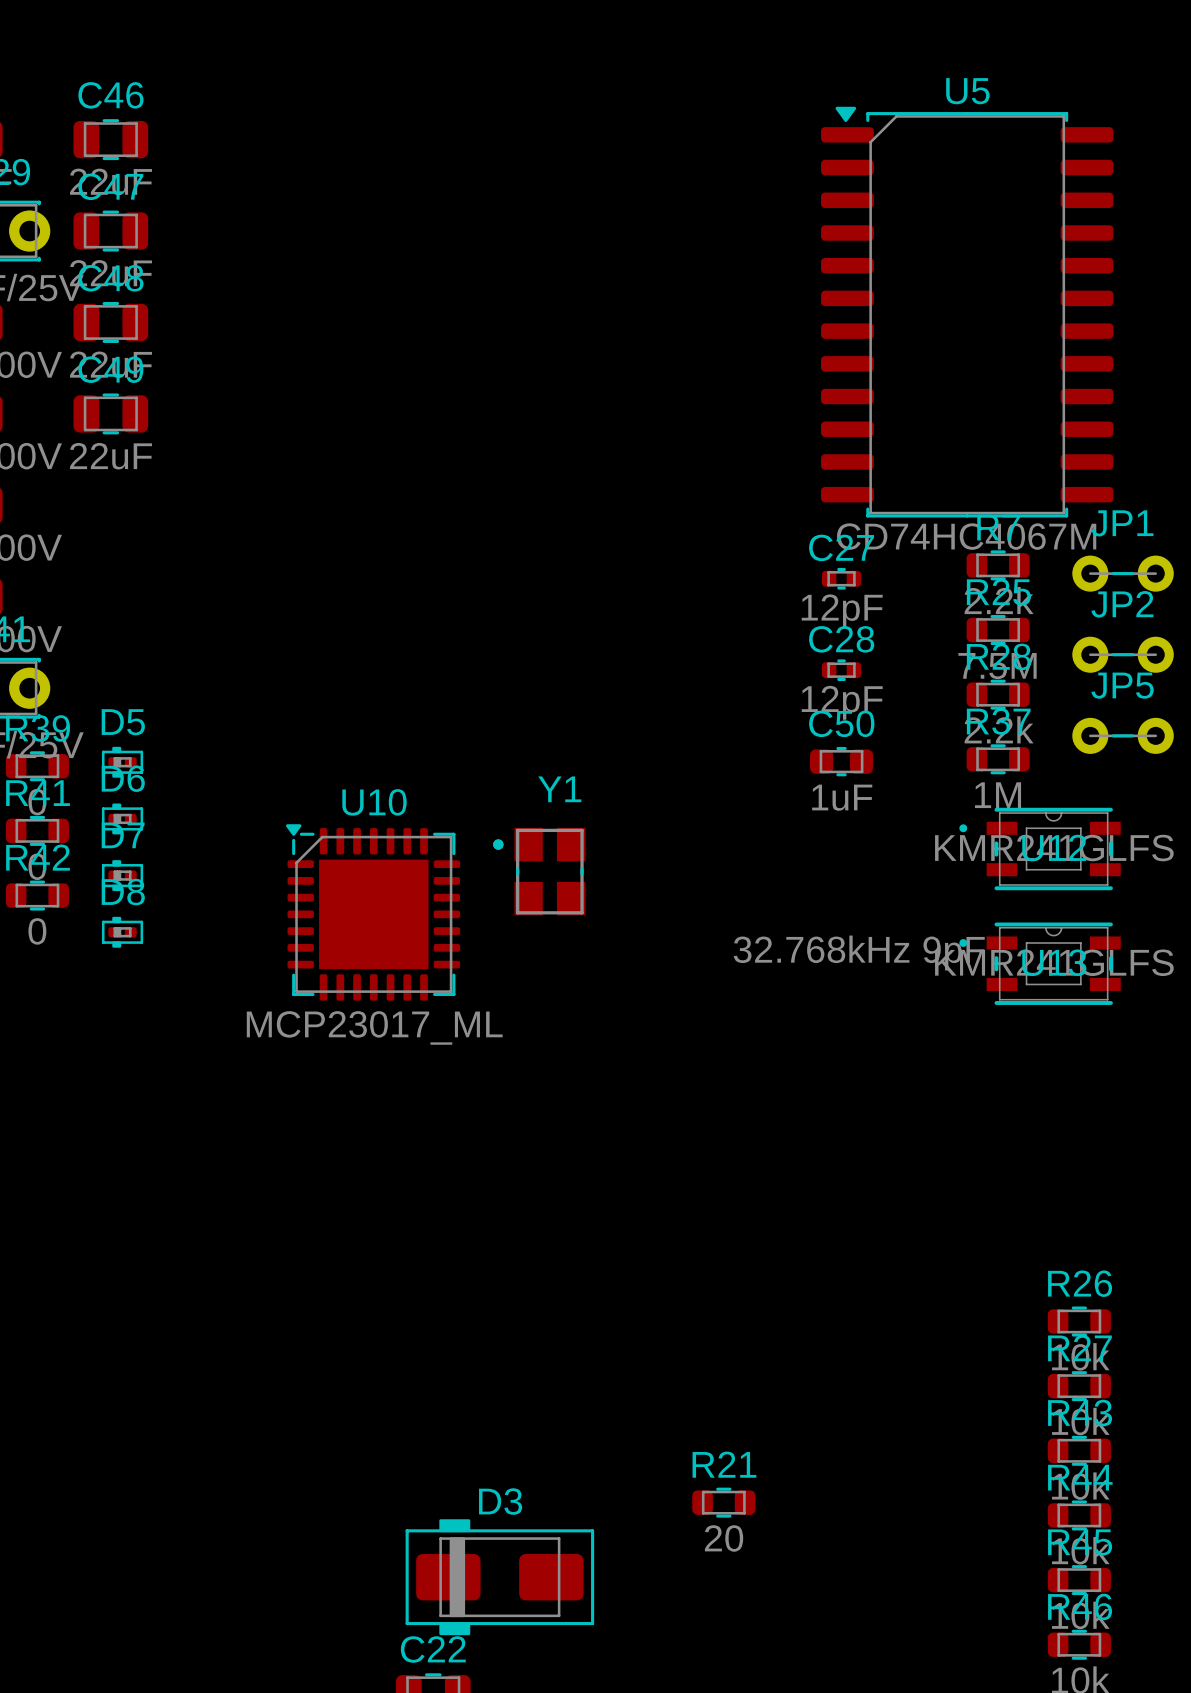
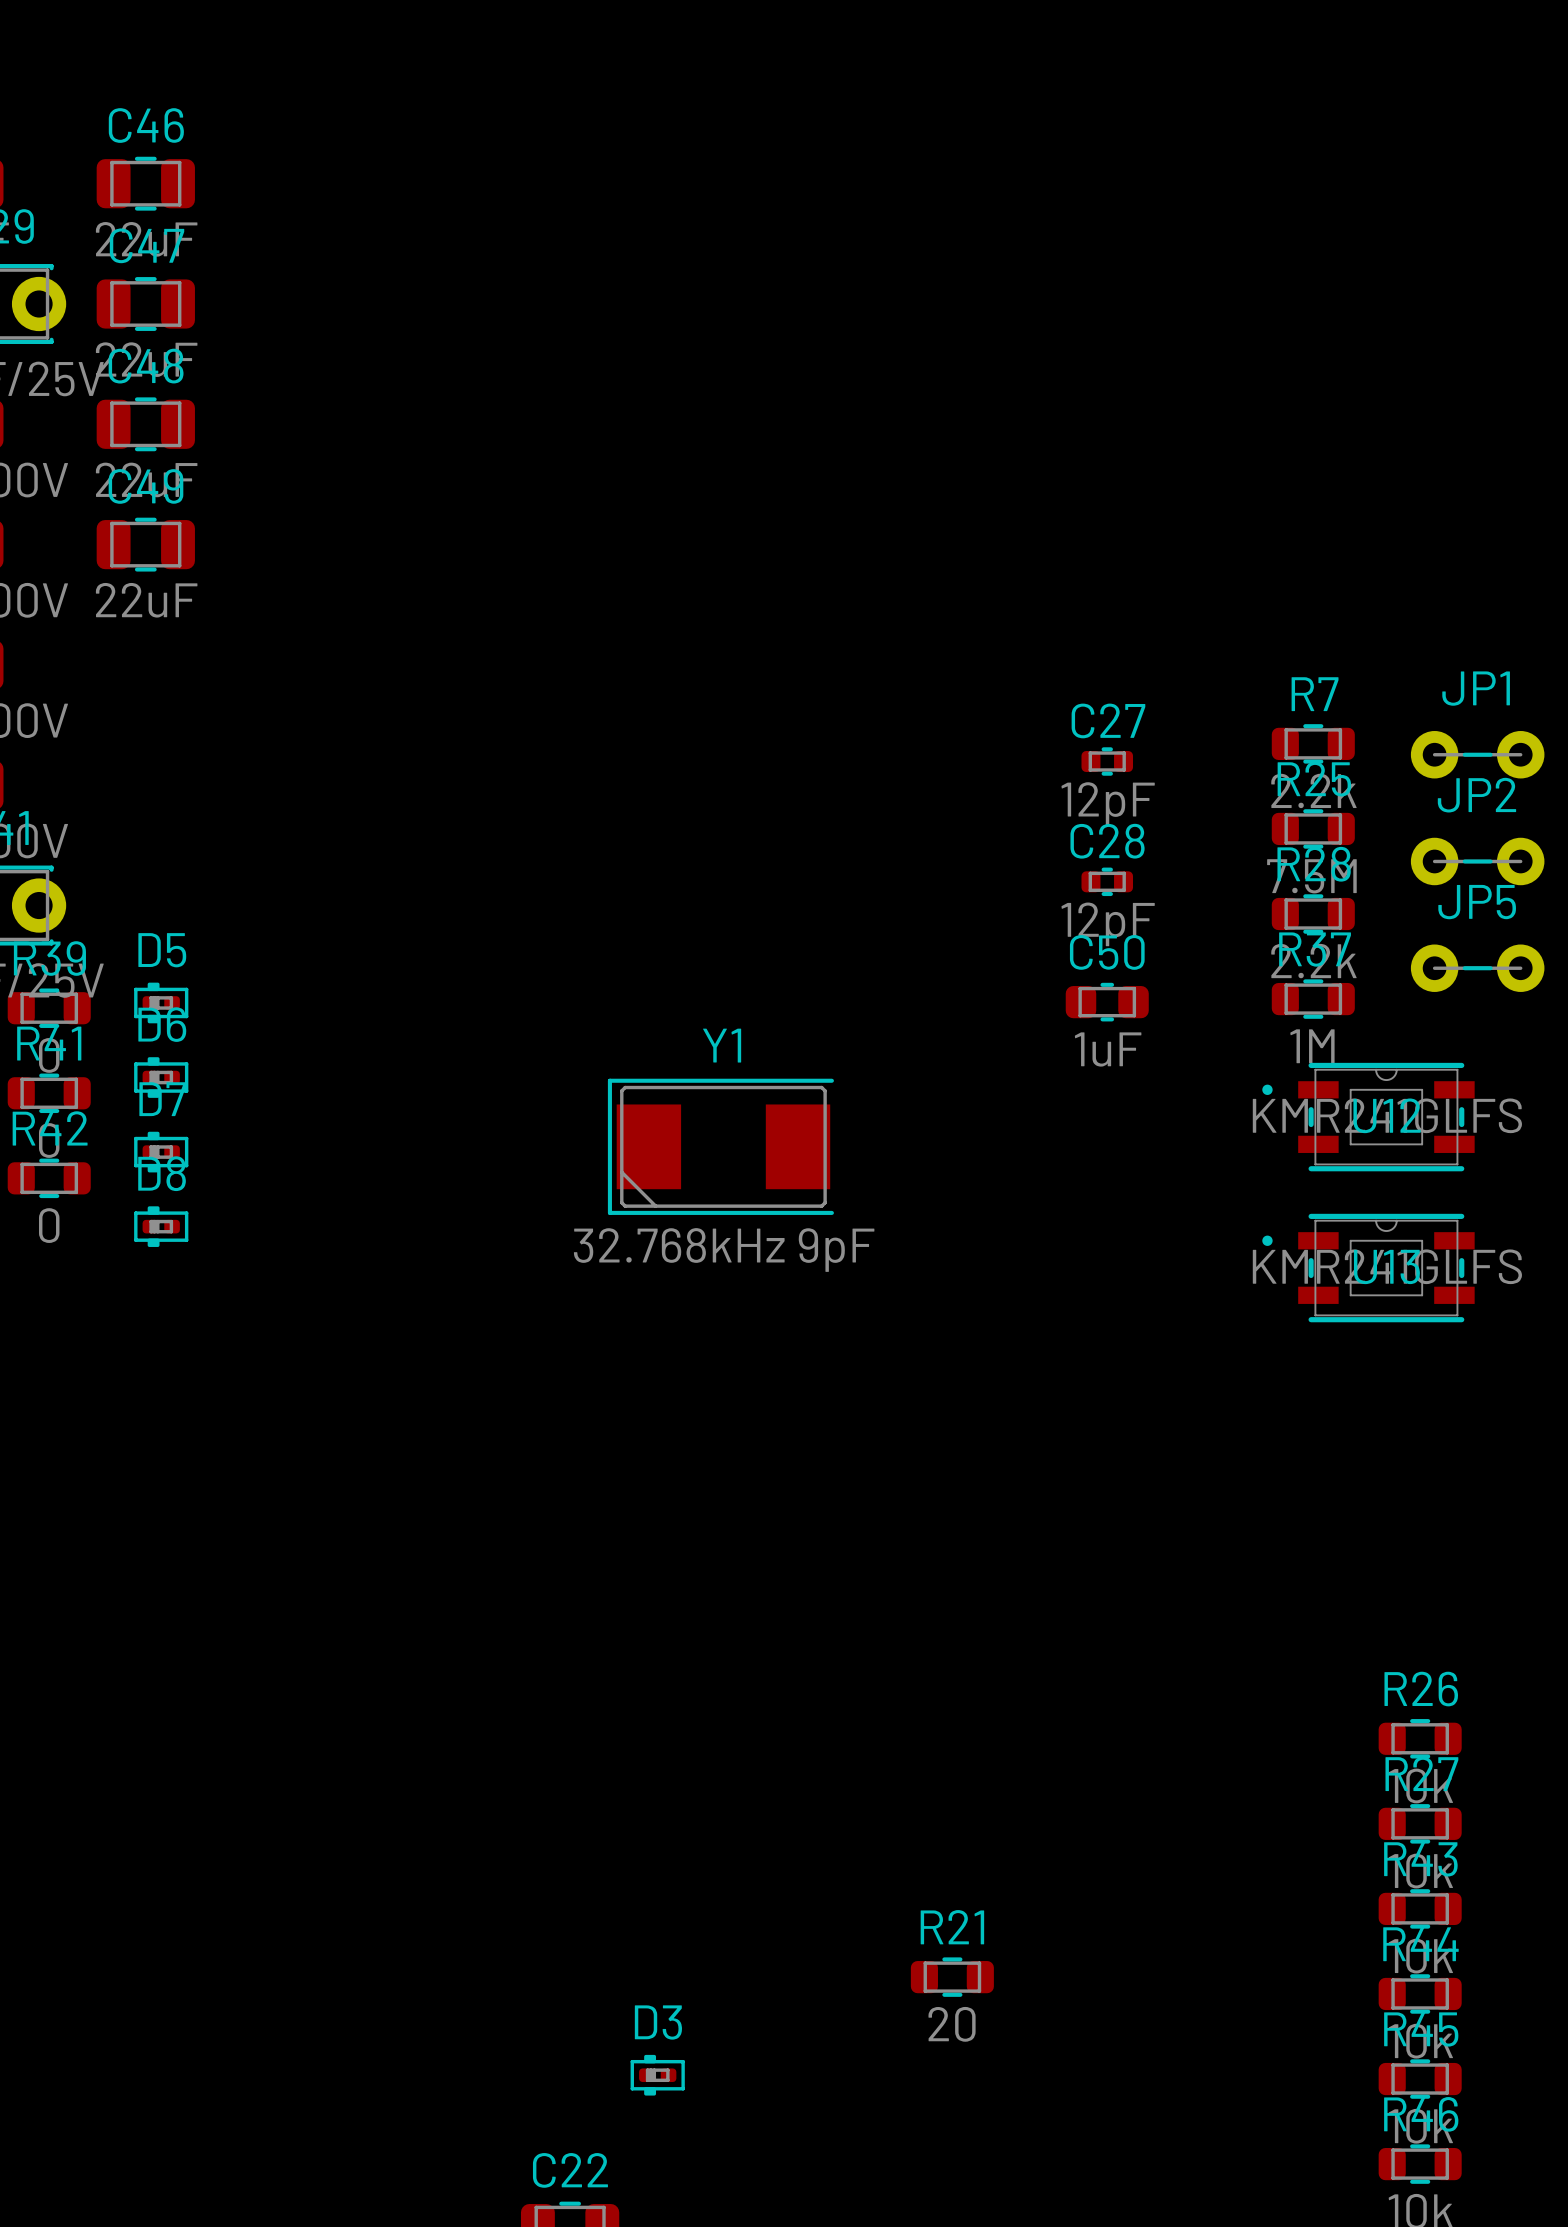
U5: CD74HC4067M (967, 312) -> none
Y1 footprint: [493, 827, 586, 916] -> [607, 1078, 834, 1215]
U10: MCP23017_ML (373, 912) -> none
Y1 value position: 32.768kHz 9pF (859, 953) -> 32.768kHz 9pF (724, 1249)
D3 footprint: [405, 1519, 595, 1636] -> [630, 2054, 685, 2096]

